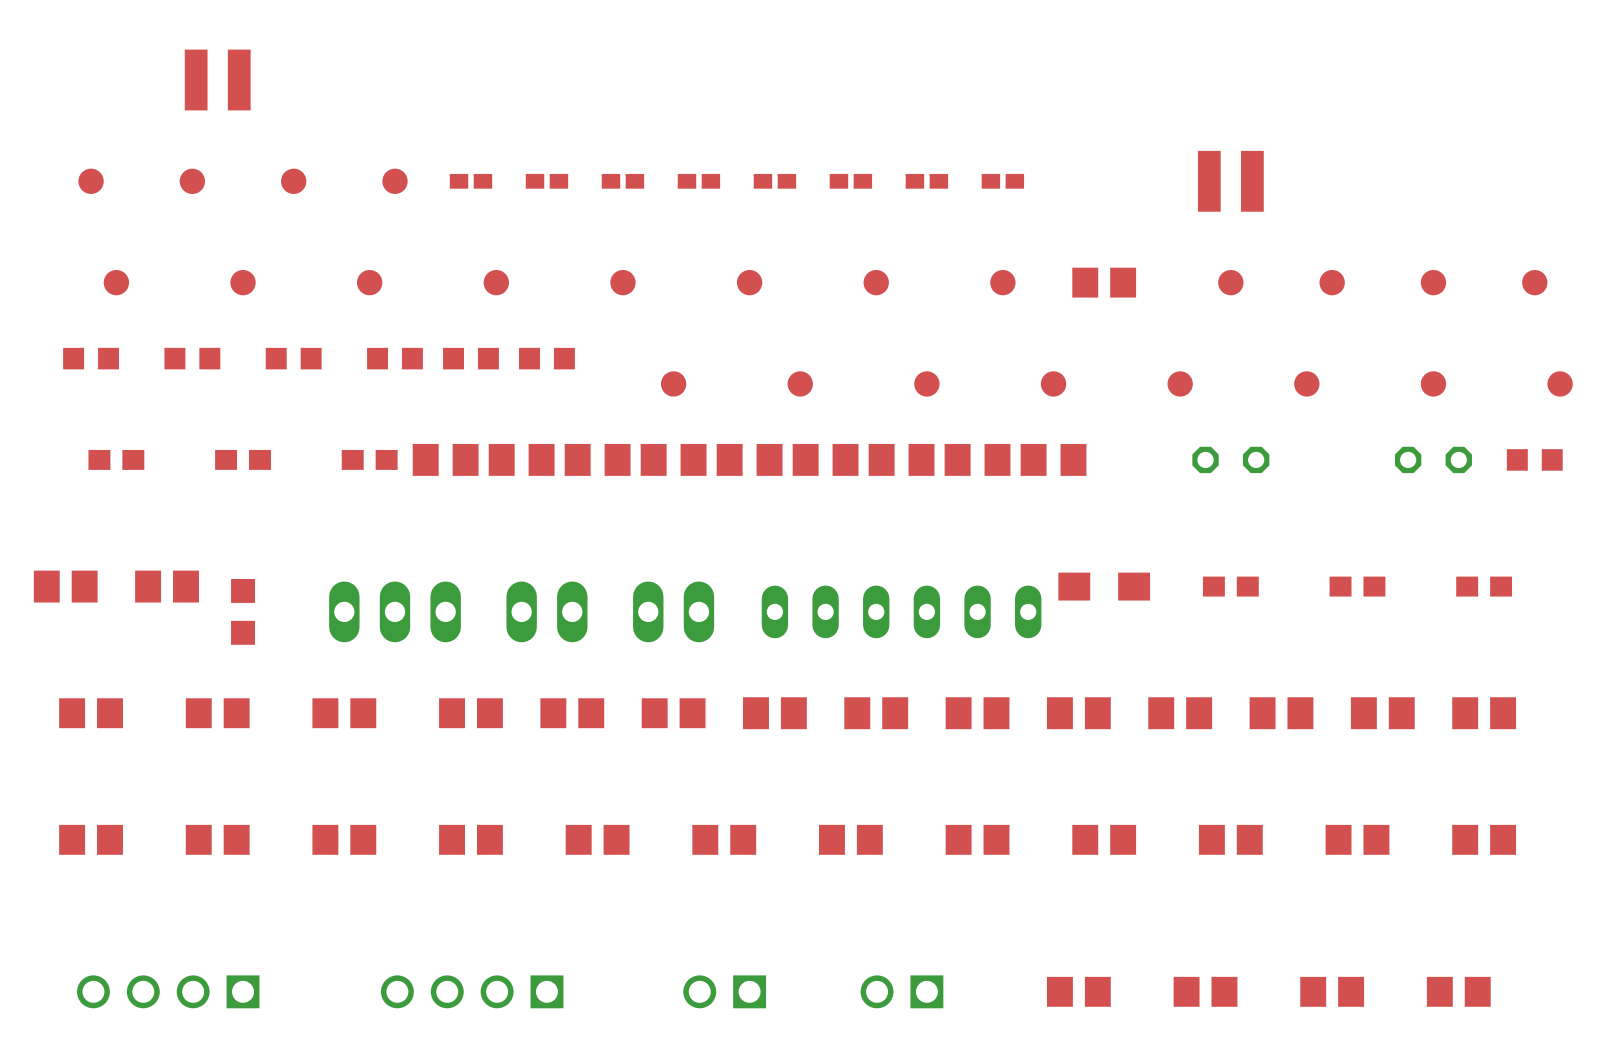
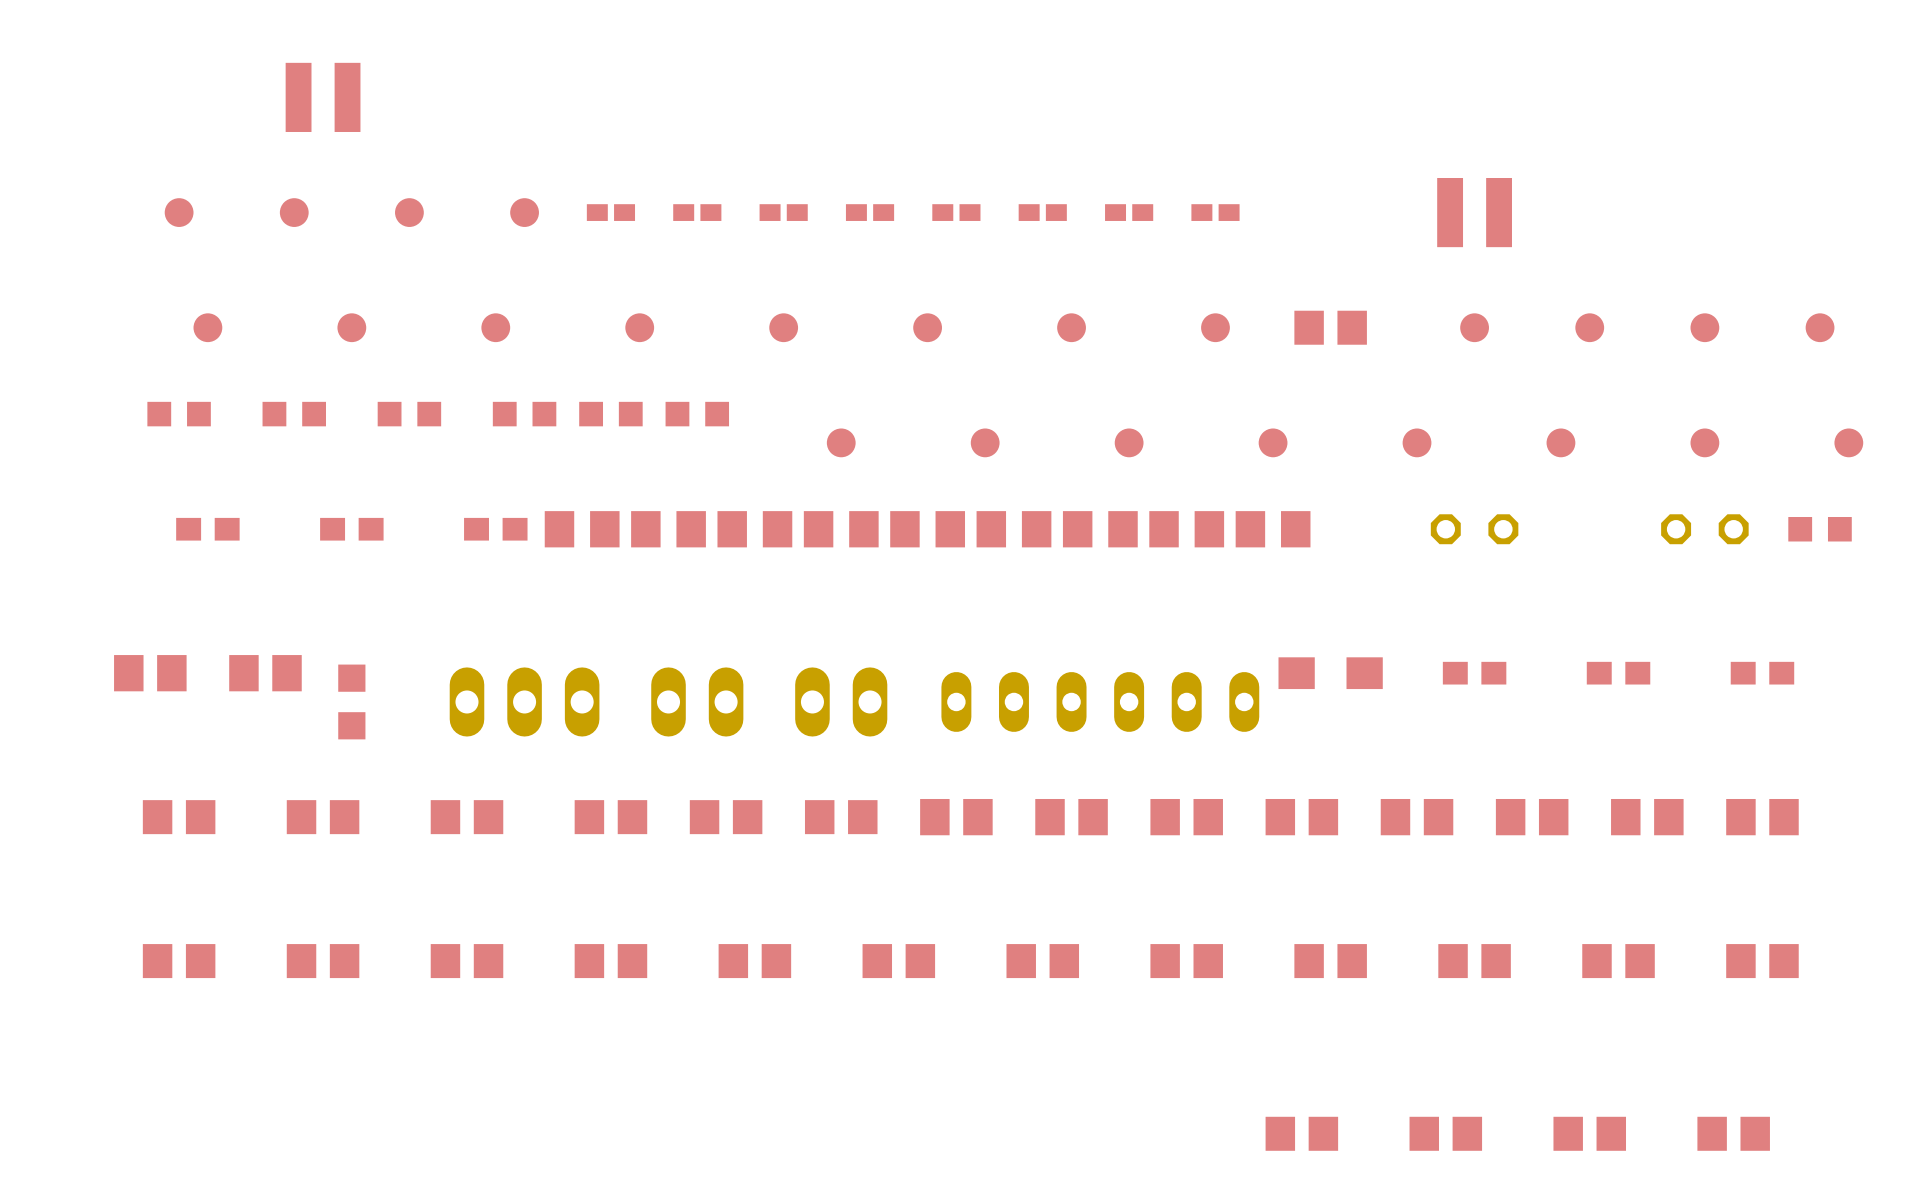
part: (168, 991) -> none
part: (472, 991) -> none
part: (724, 991) -> none
part: (901, 991) -> none

